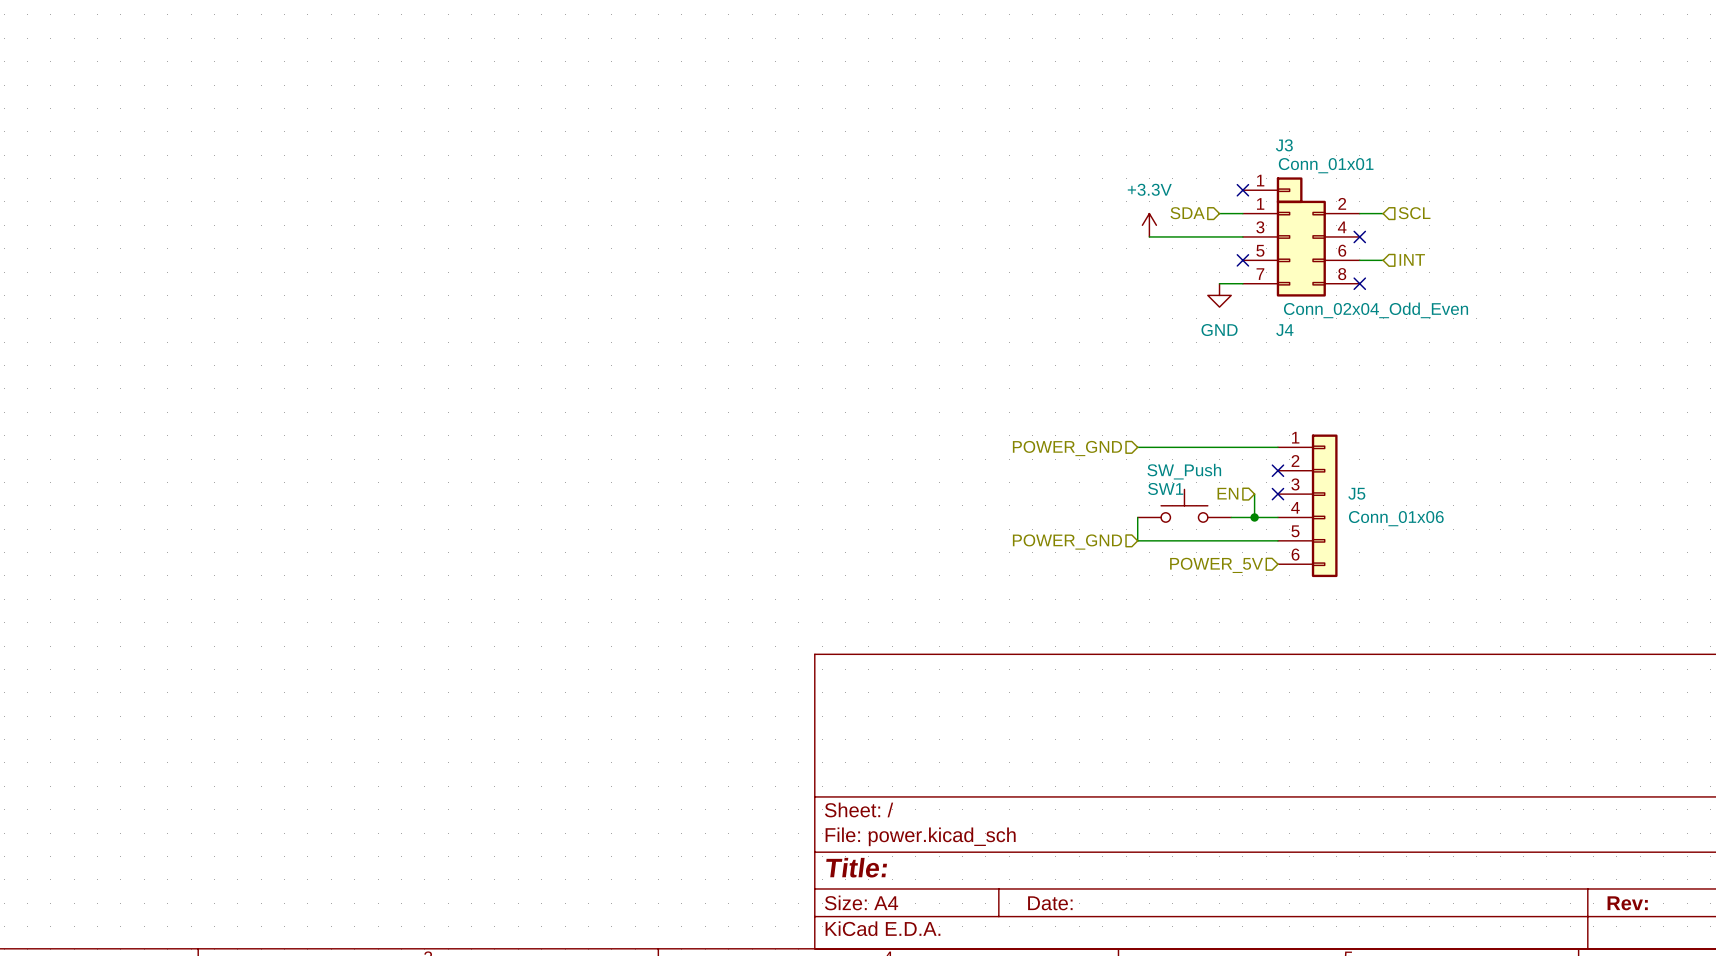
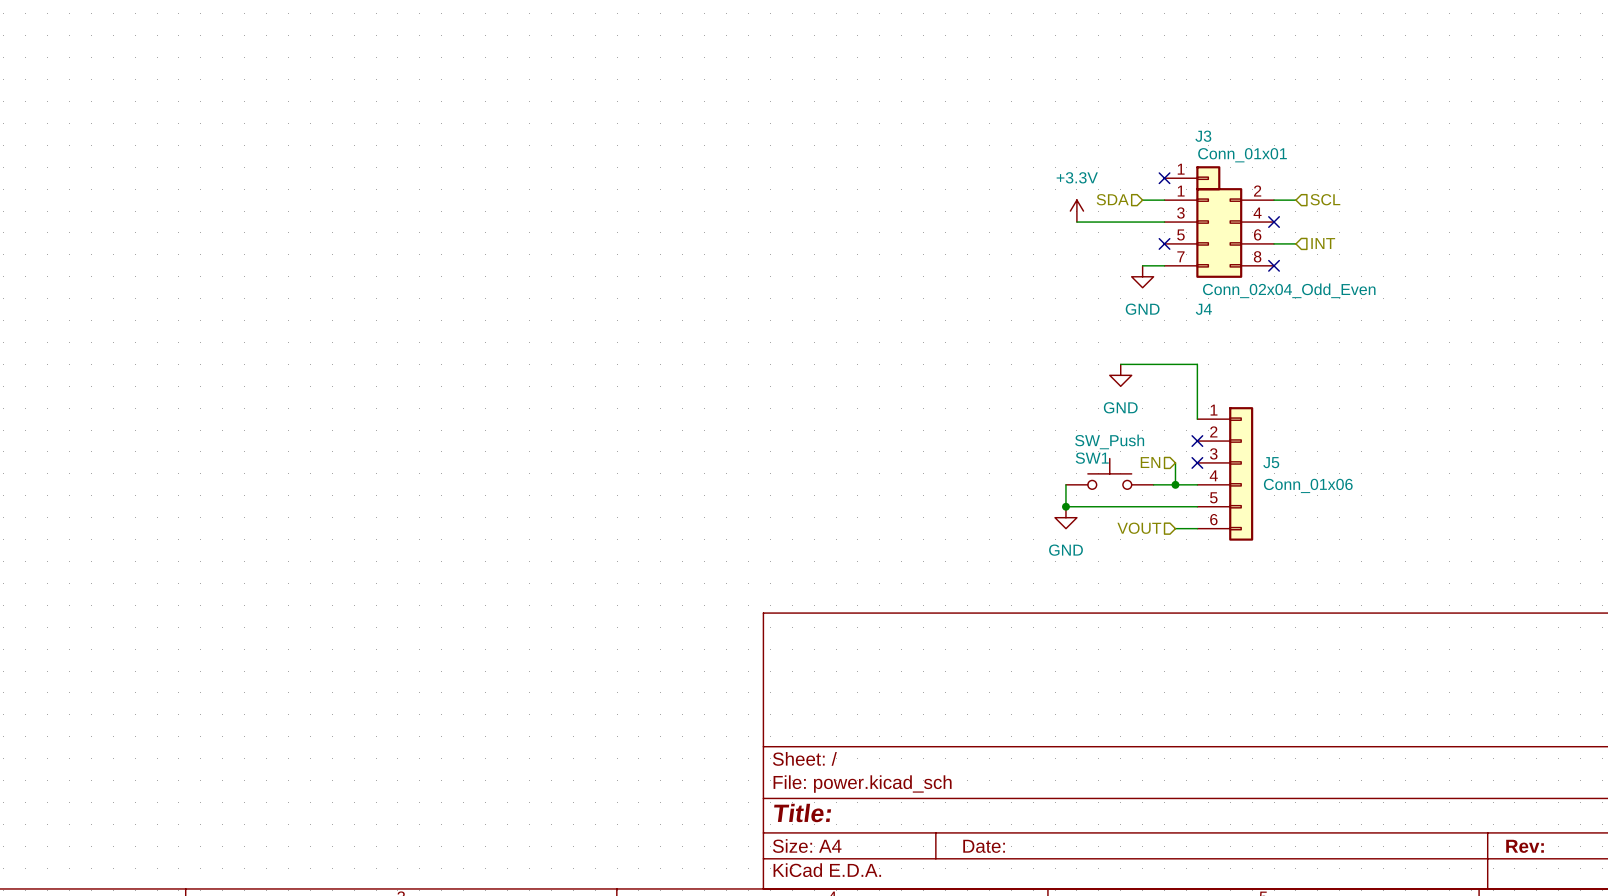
power symbol: none -> GND (1120, 375)
wire: (1137, 447) (1277, 447) -> (1120, 364) (1197, 364) (1197, 419)
hierarchical label: POWER_GND (1067, 448) -> none
junction: none -> (1065, 506)
hierarchical label: POWER_GND (1067, 542) -> none
power symbol: none -> GND (1065, 517)
hierarchical label: none -> VOUT (1139, 528)
wire: none -> (1175, 528) (1197, 528)
hierarchical label: POWER_5V (1216, 565) -> none

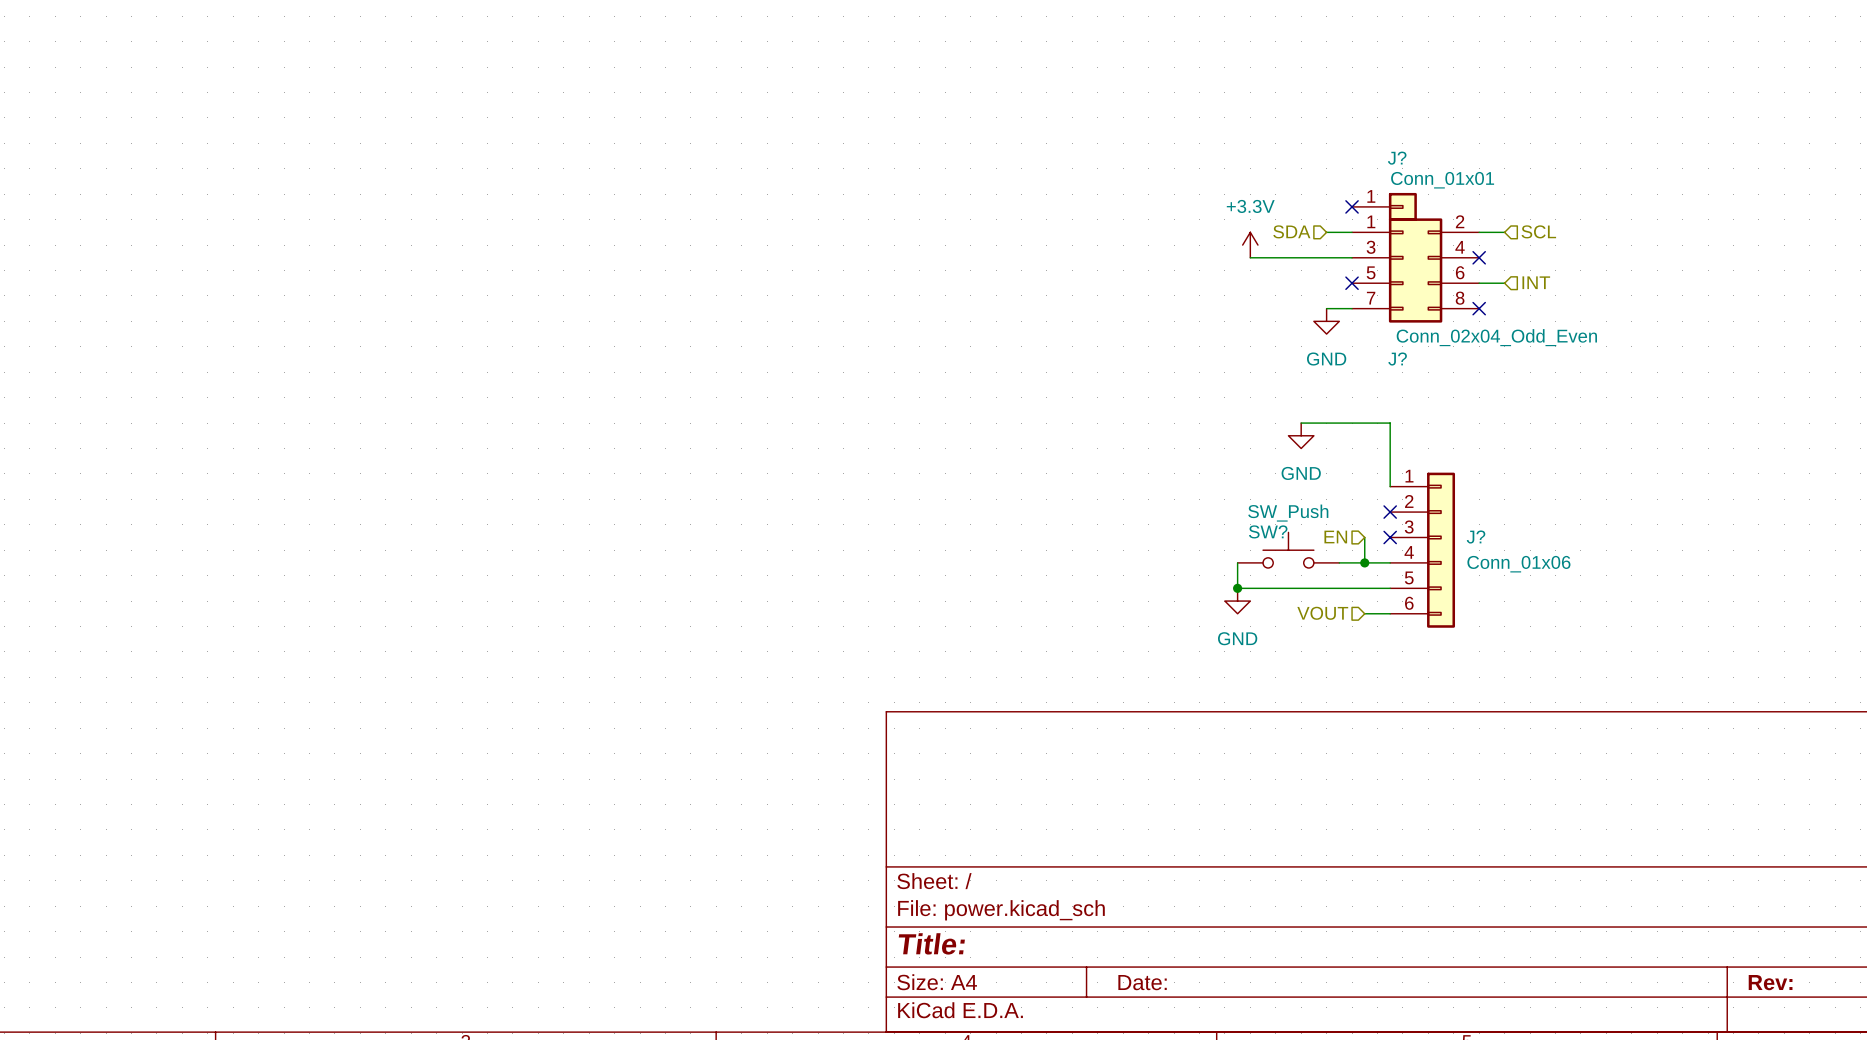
J3 name: J3 (1203, 136) -> J? (1397, 158)
J4 name: J4 (1203, 309) -> J? (1397, 359)
SW1 name: SW1 (1092, 458) -> SW? (1268, 531)
J5 name: J5 (1271, 462) -> J? (1476, 537)

